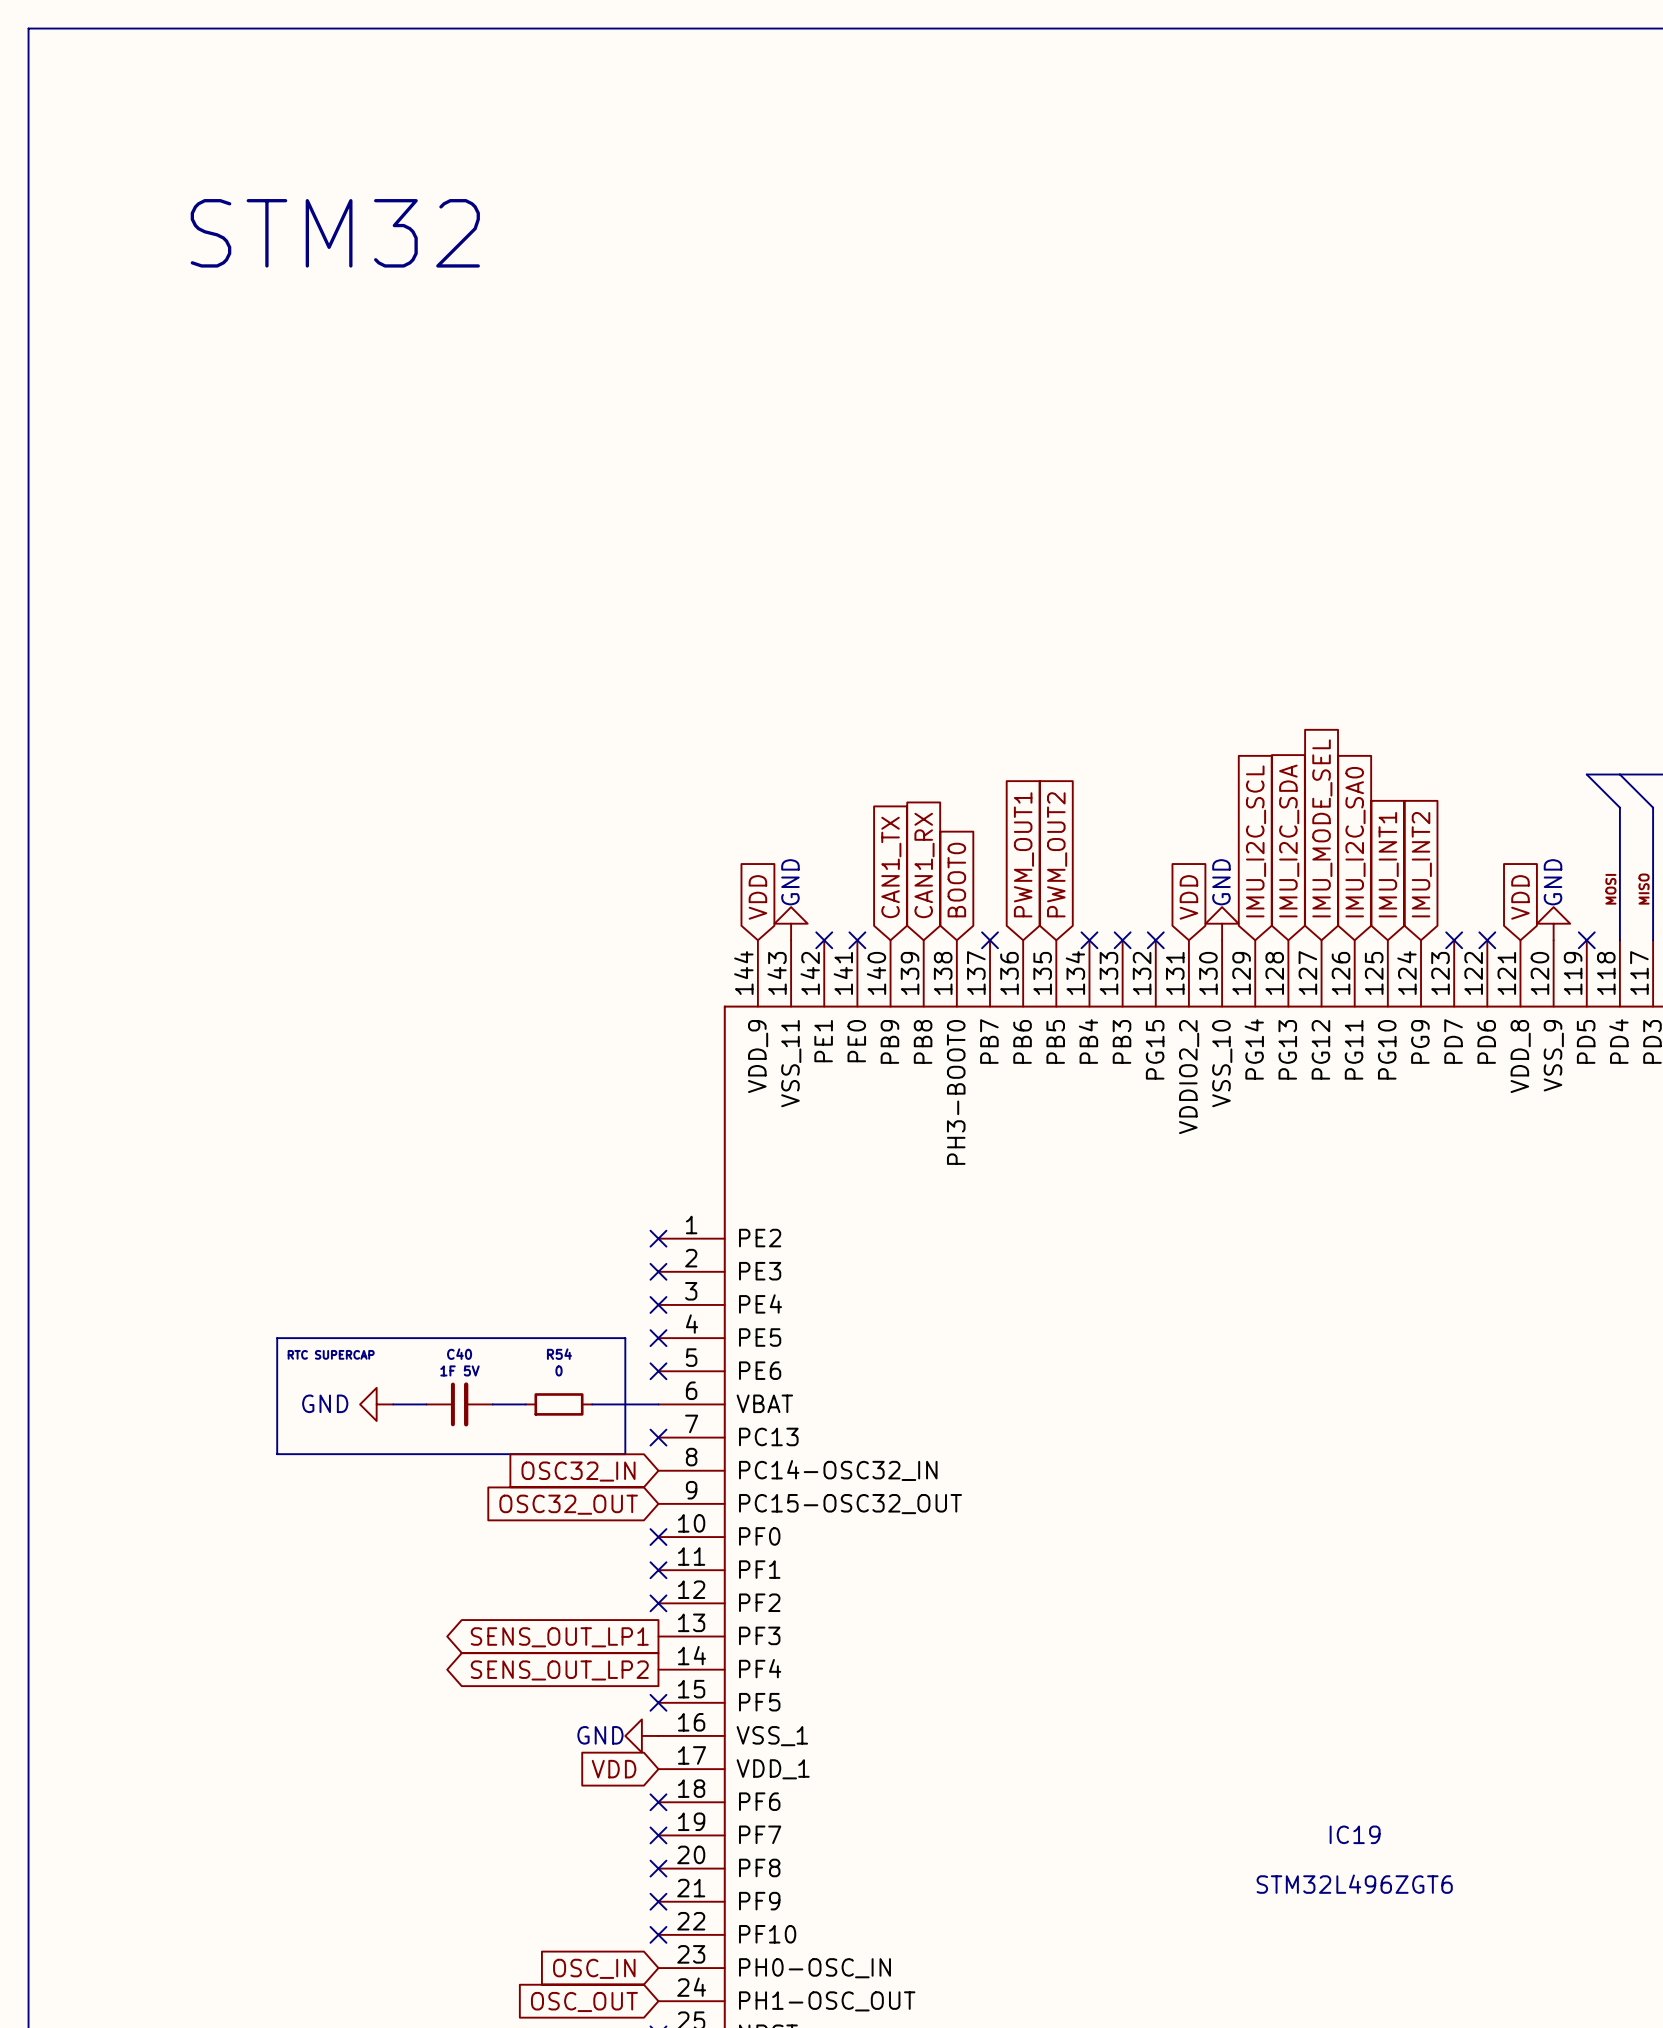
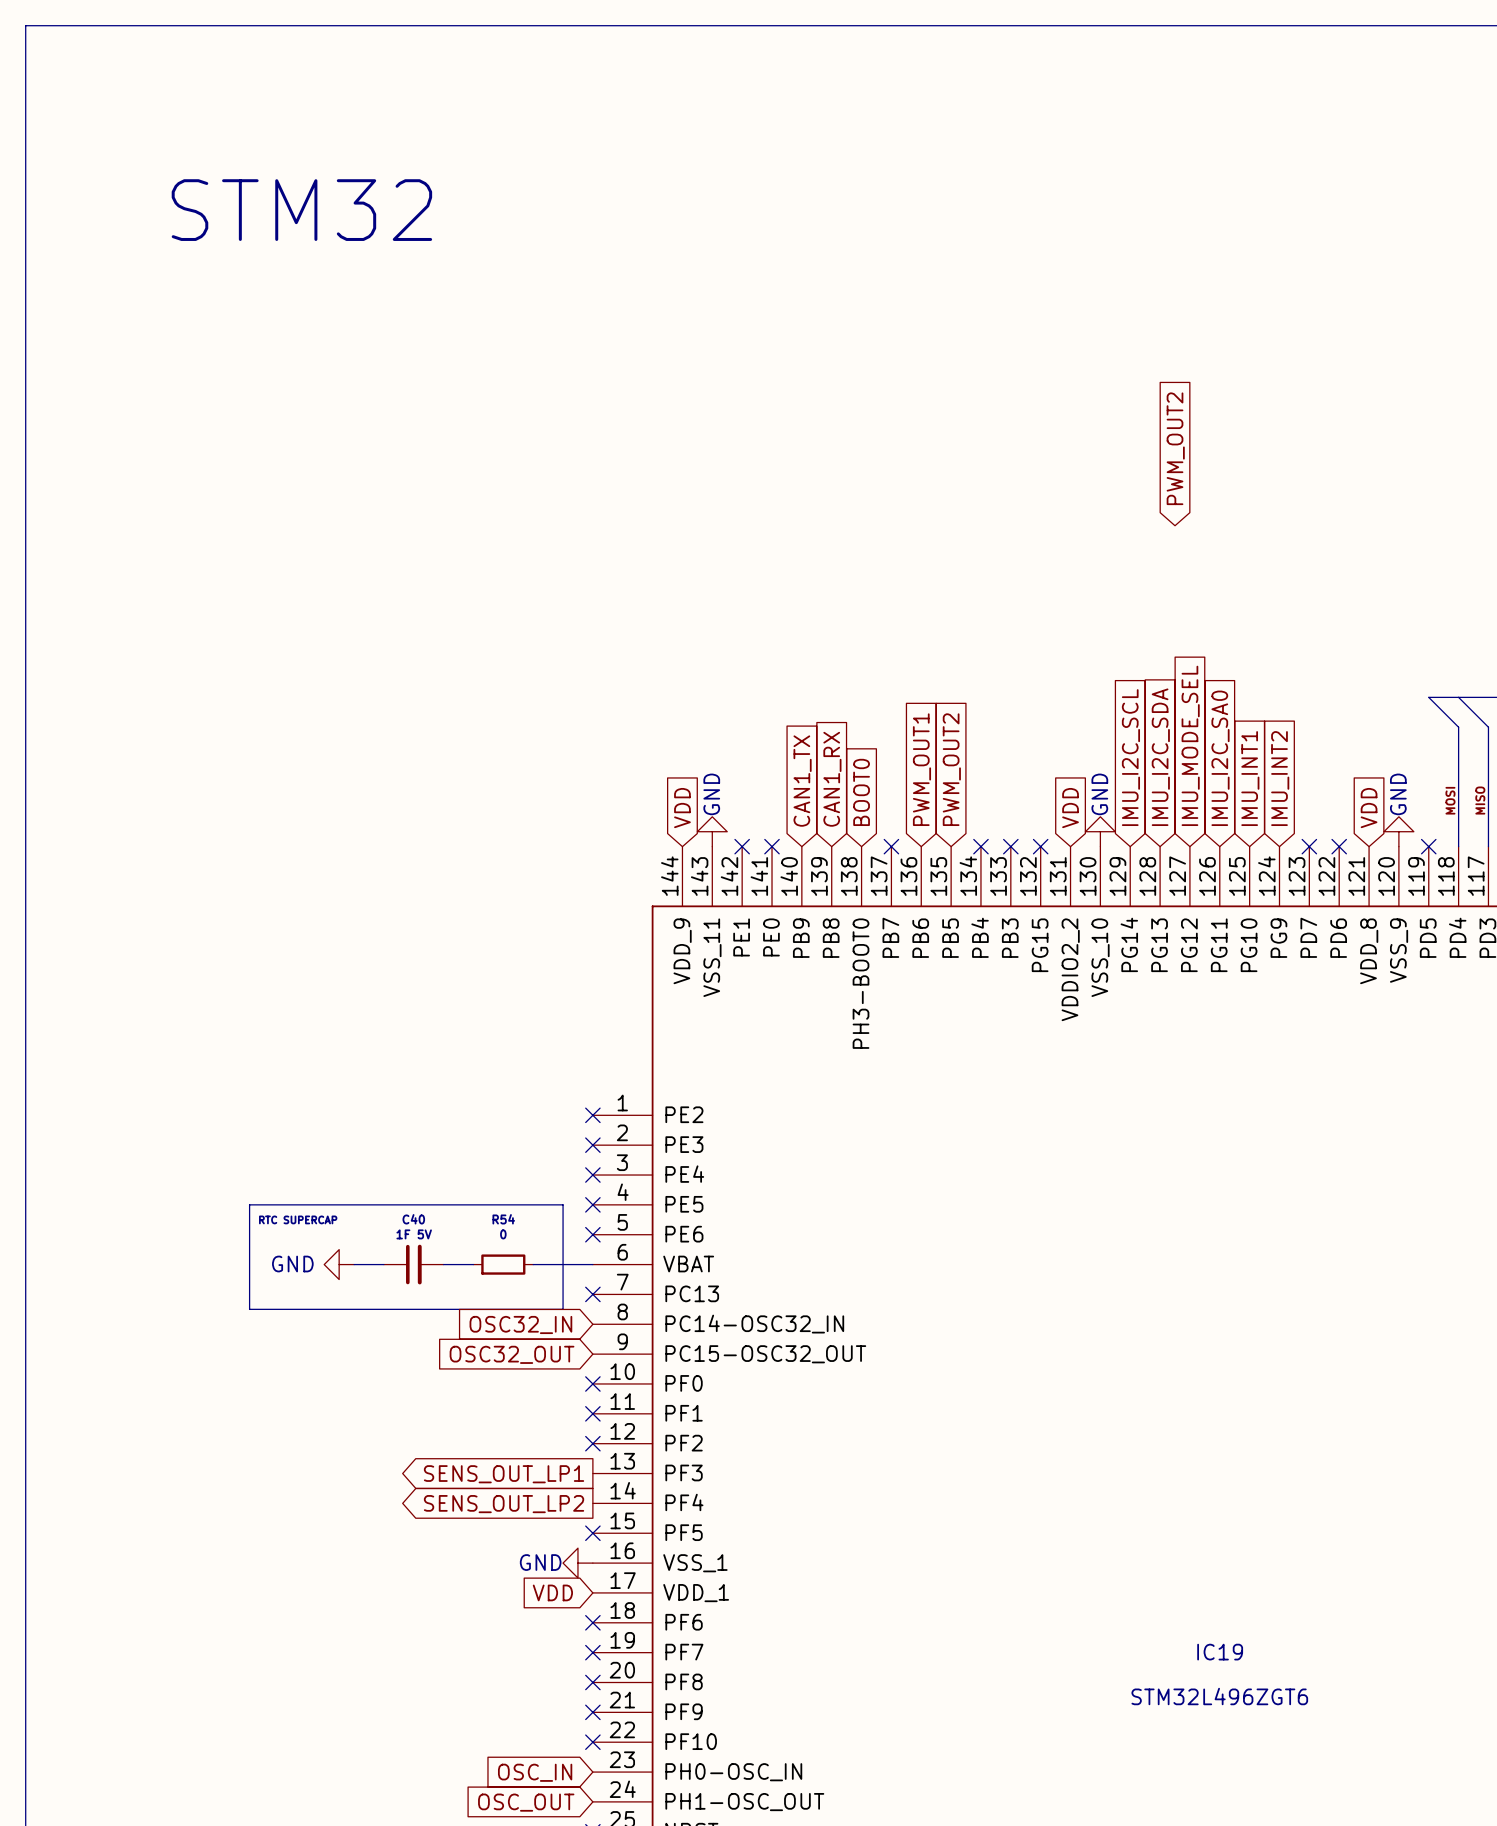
global label: none -> PWM_OUT2 (1175, 448)

